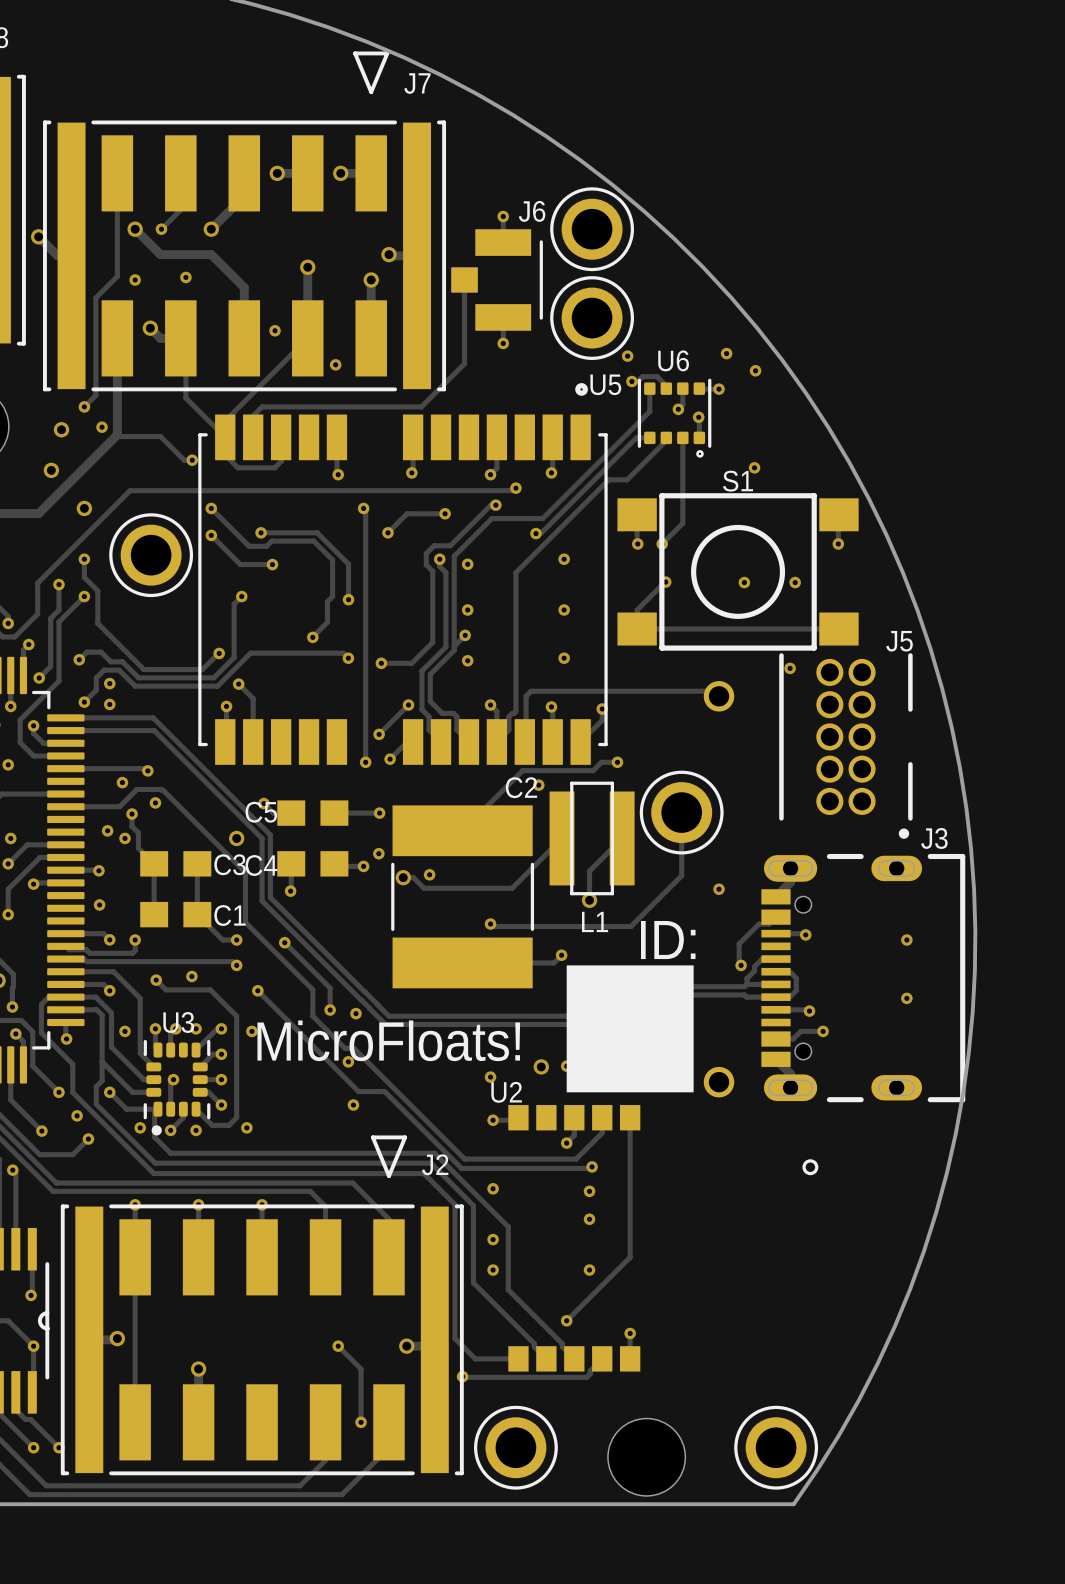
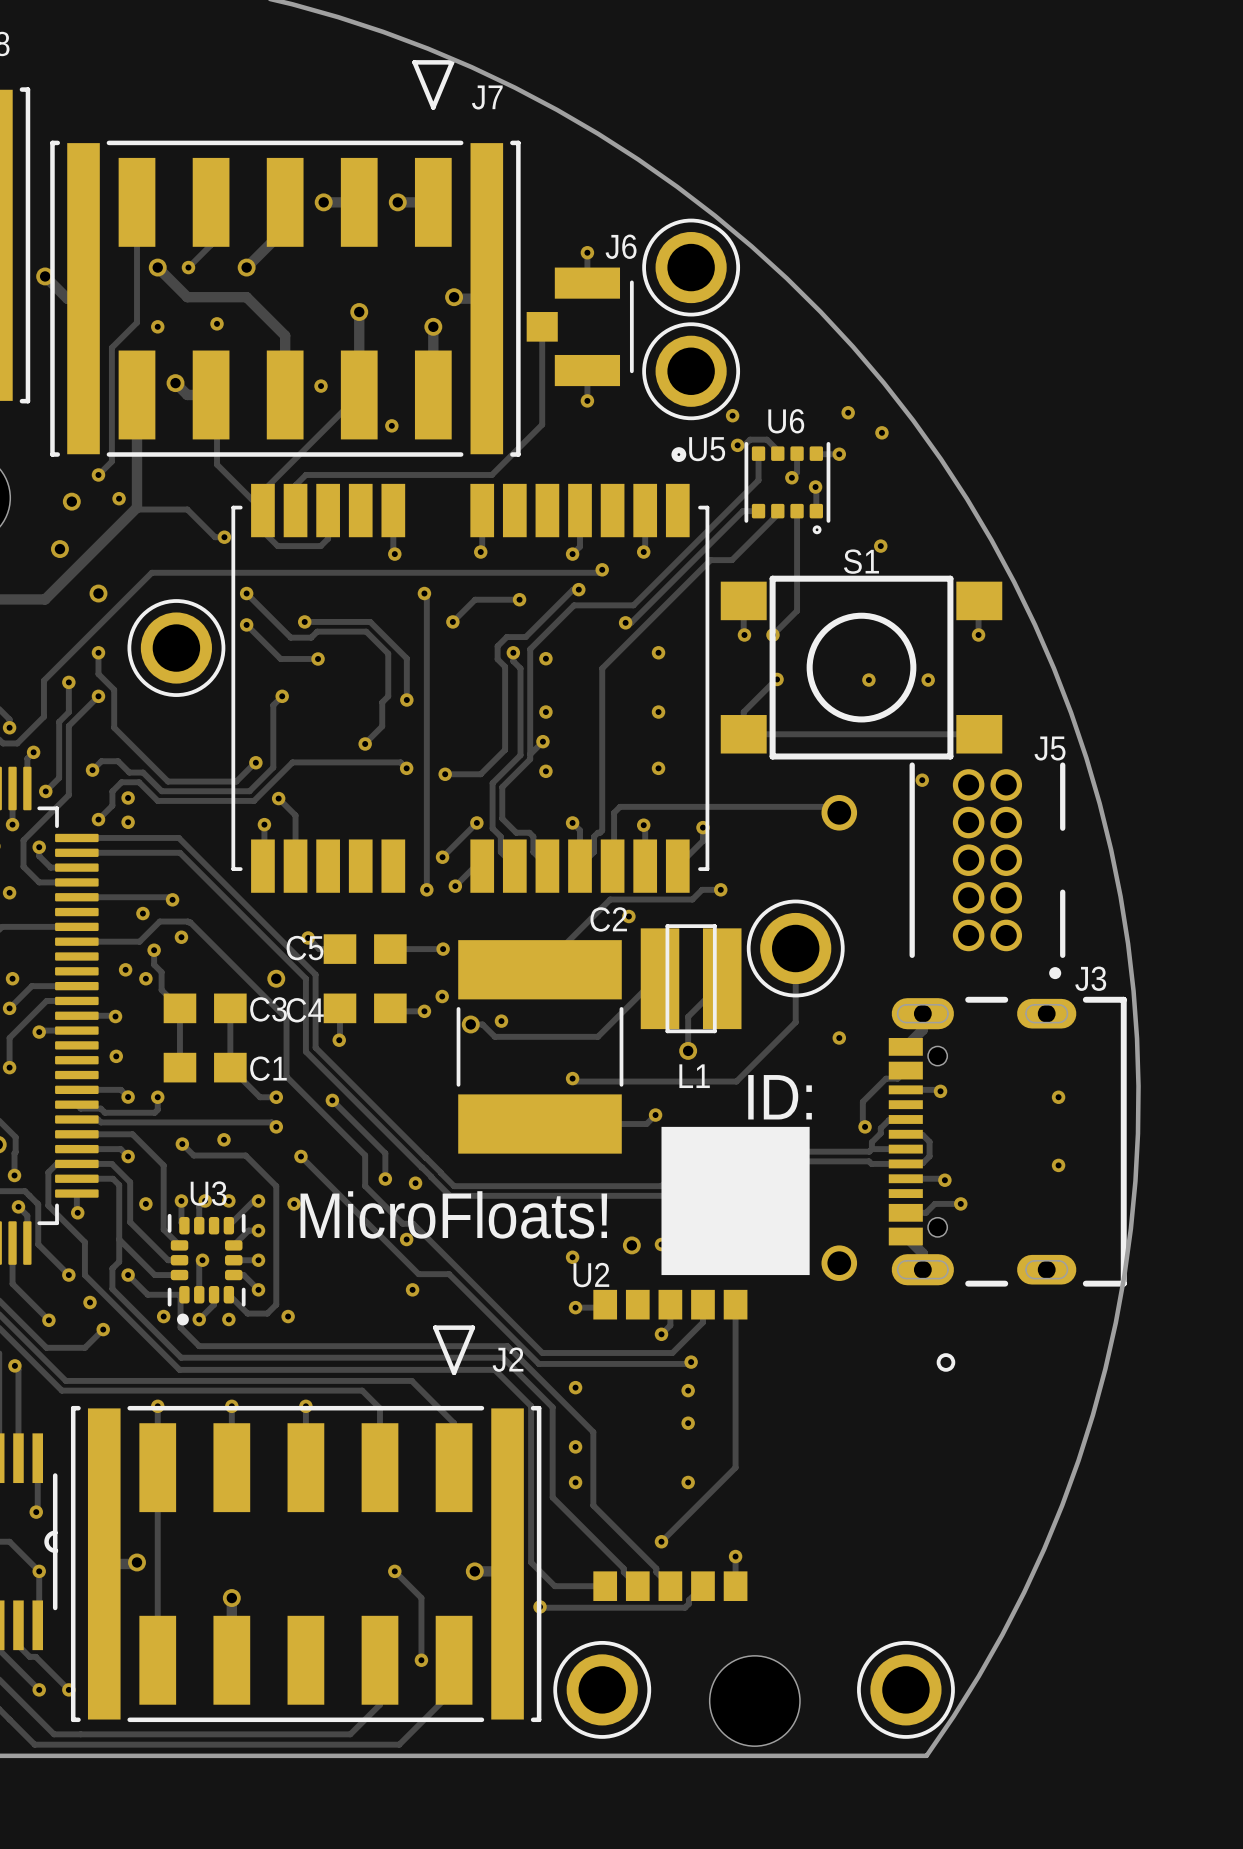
L1 footprint: [549, 781, 635, 896] -> [640, 924, 742, 1034]

